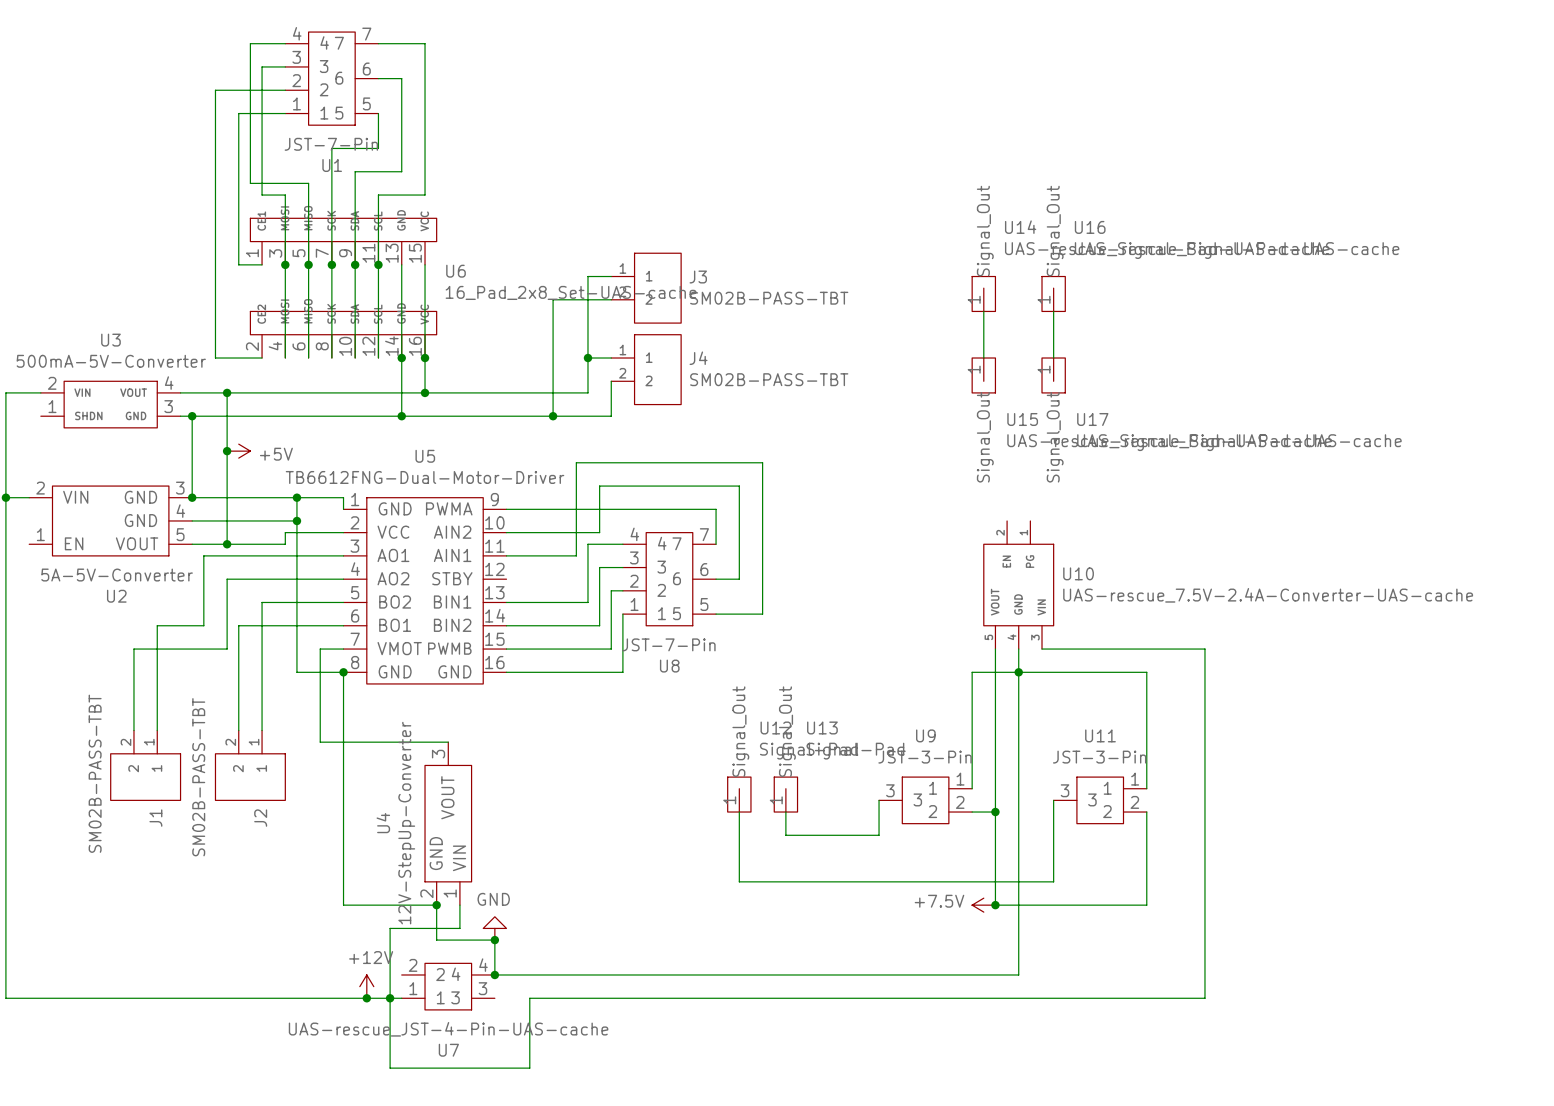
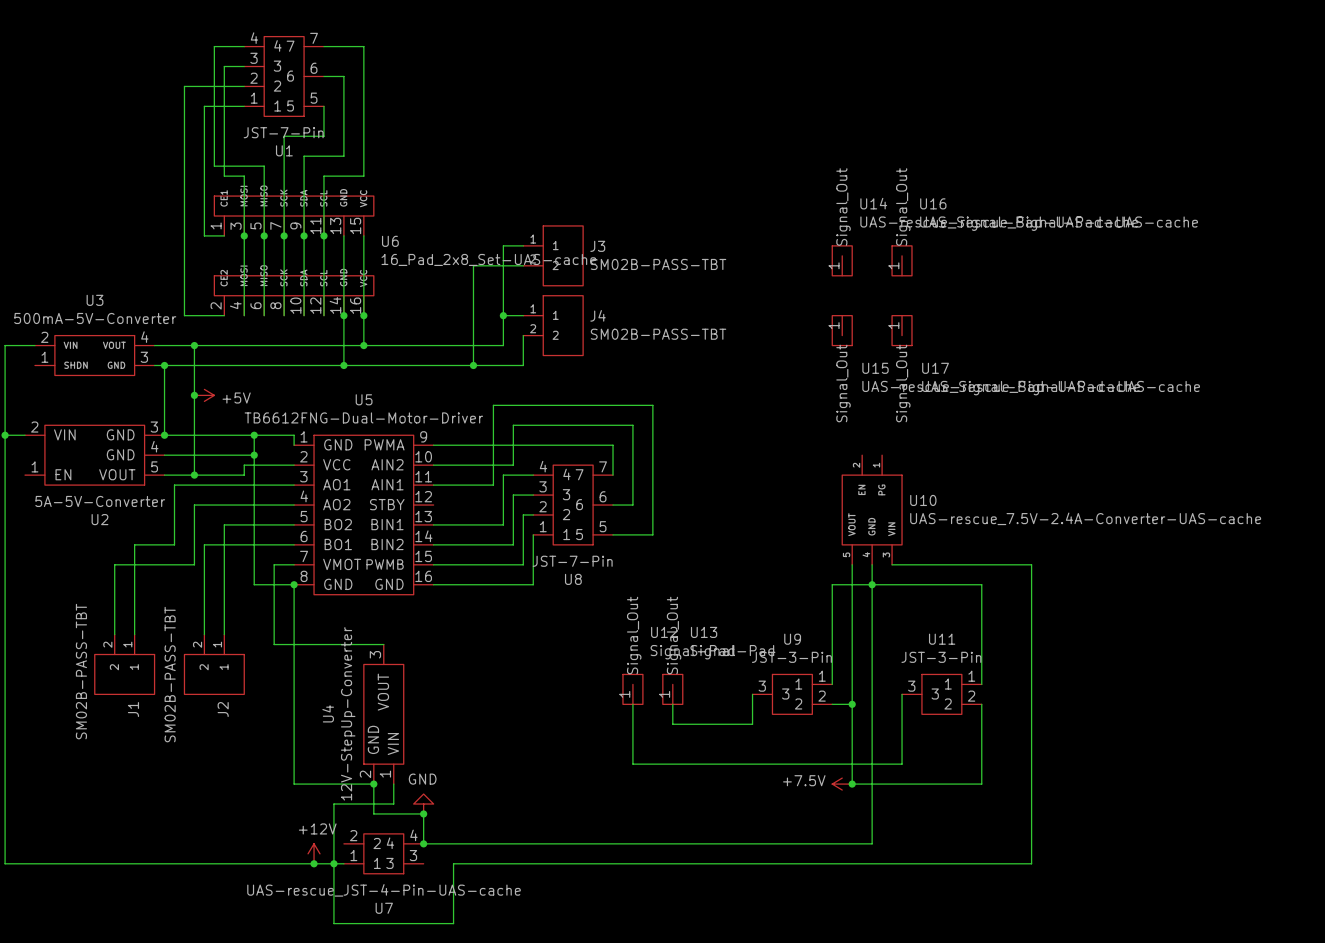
wire: (983, 311) (983, 358) -> none
wire: (1053, 311) (1053, 358) -> none

